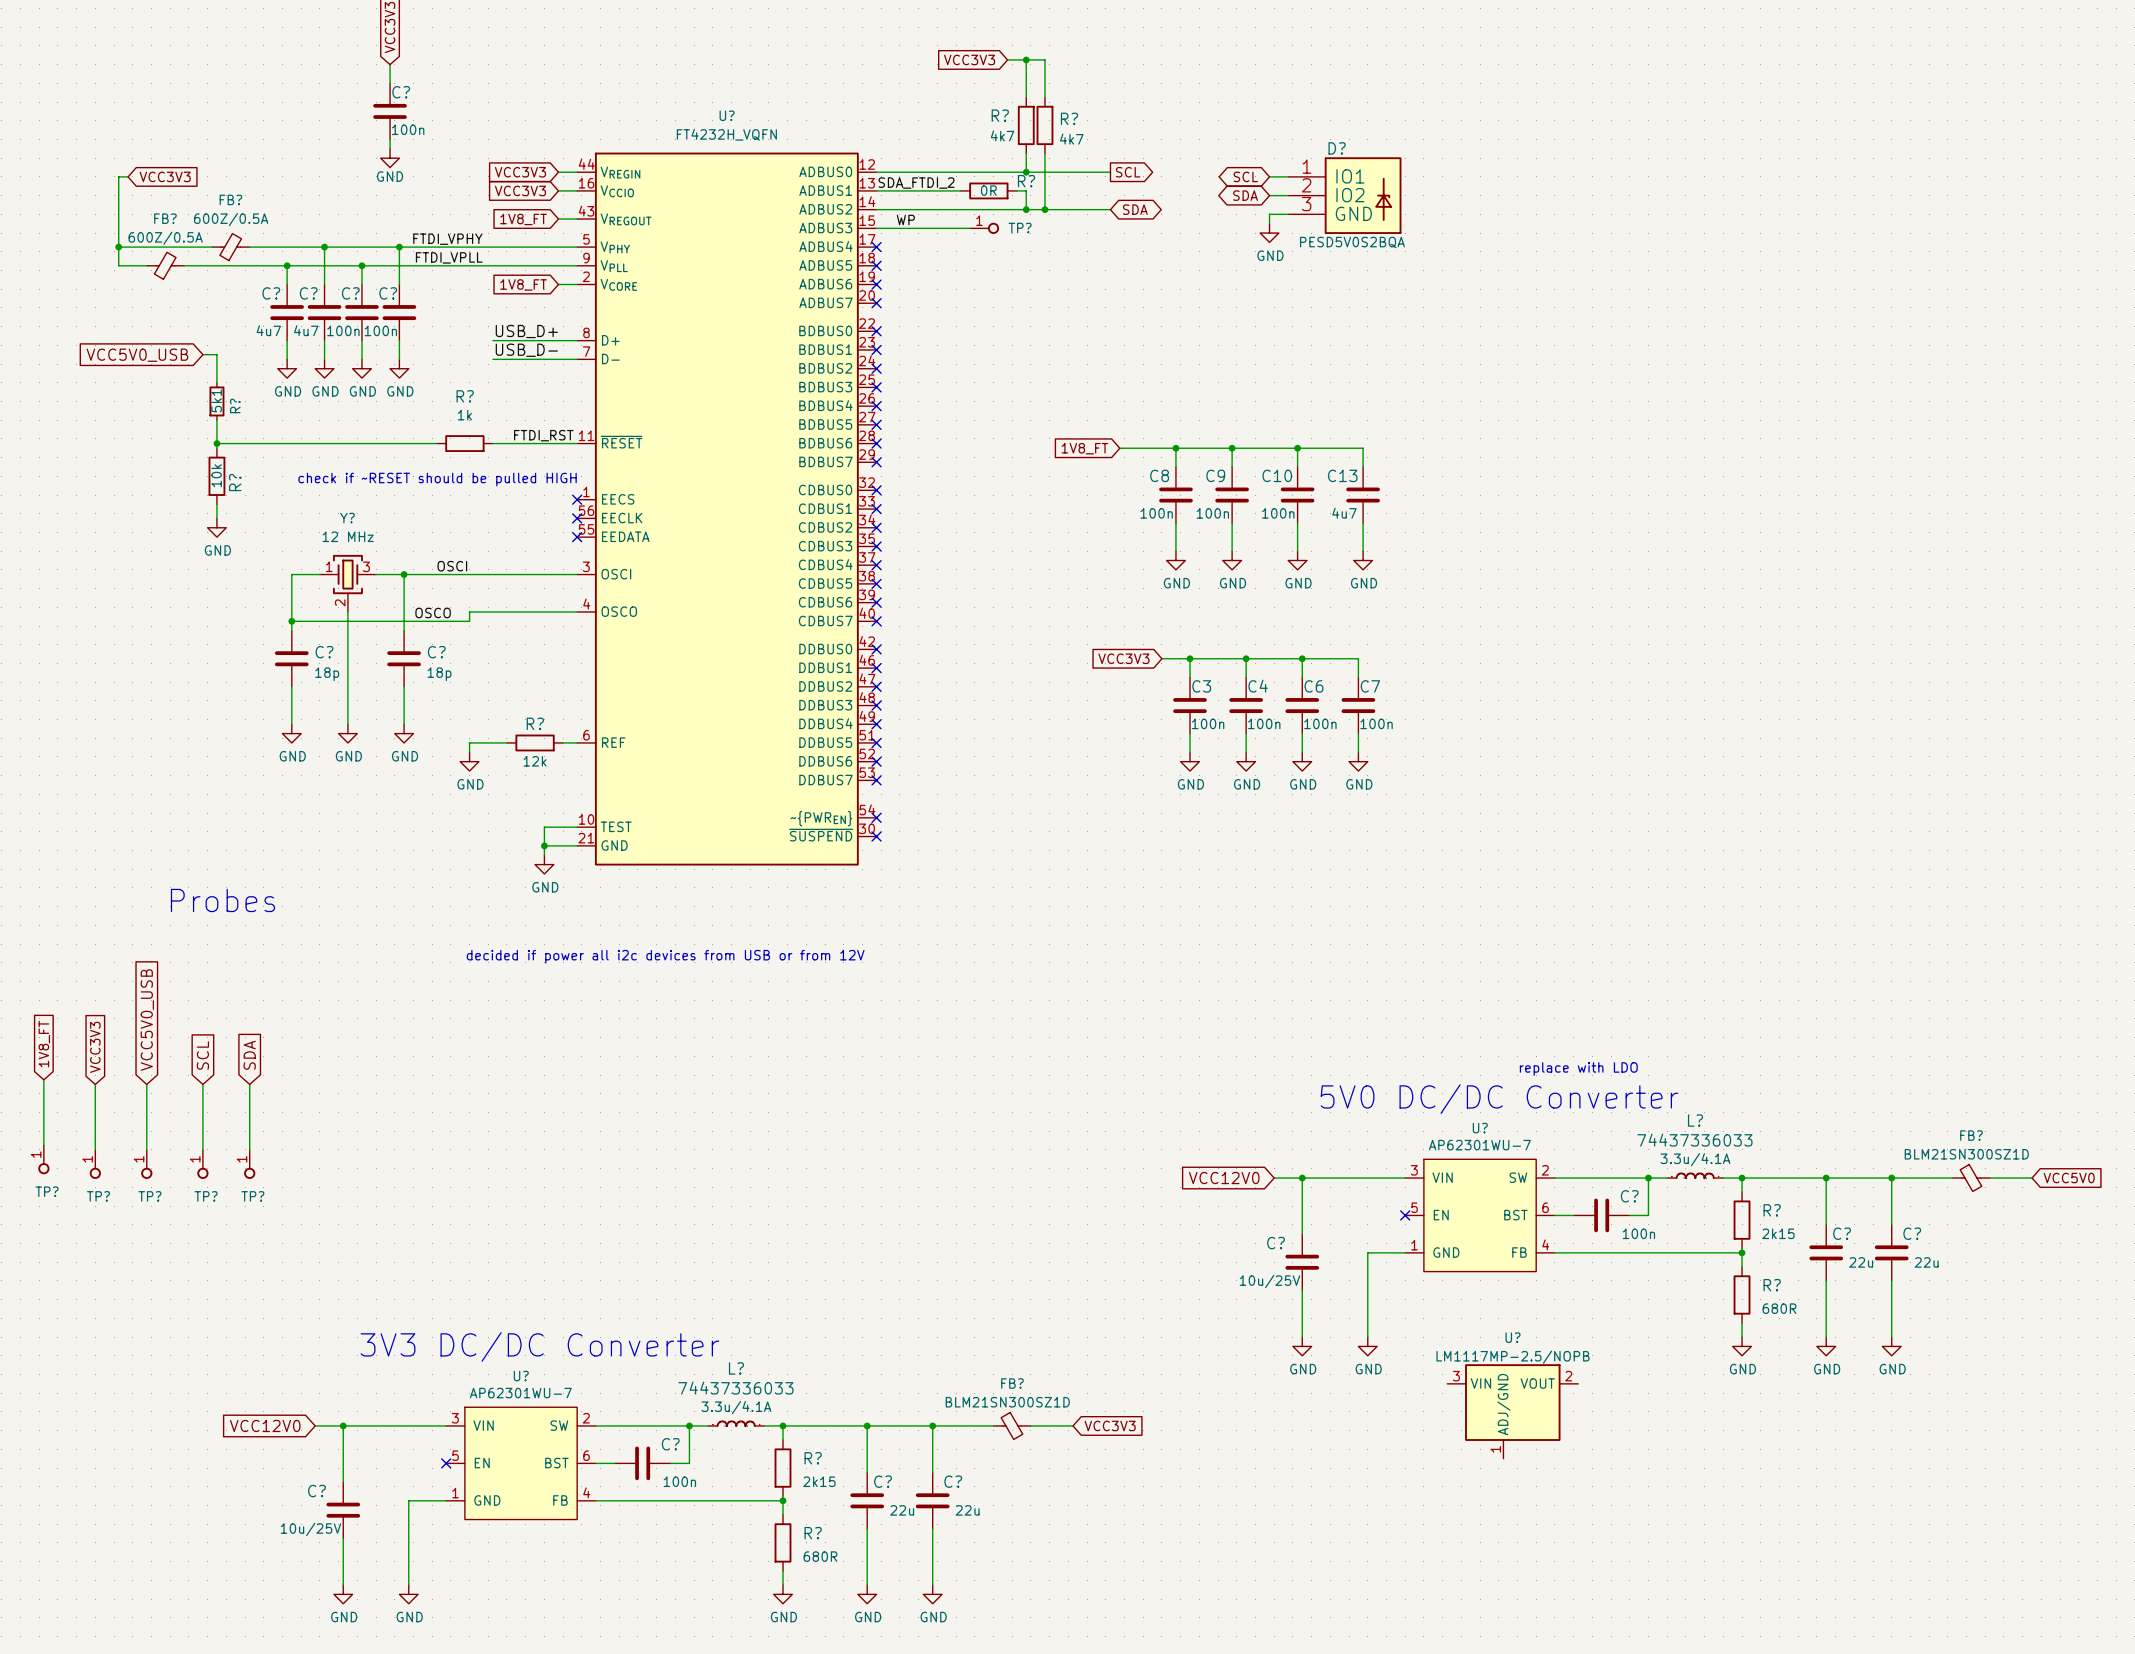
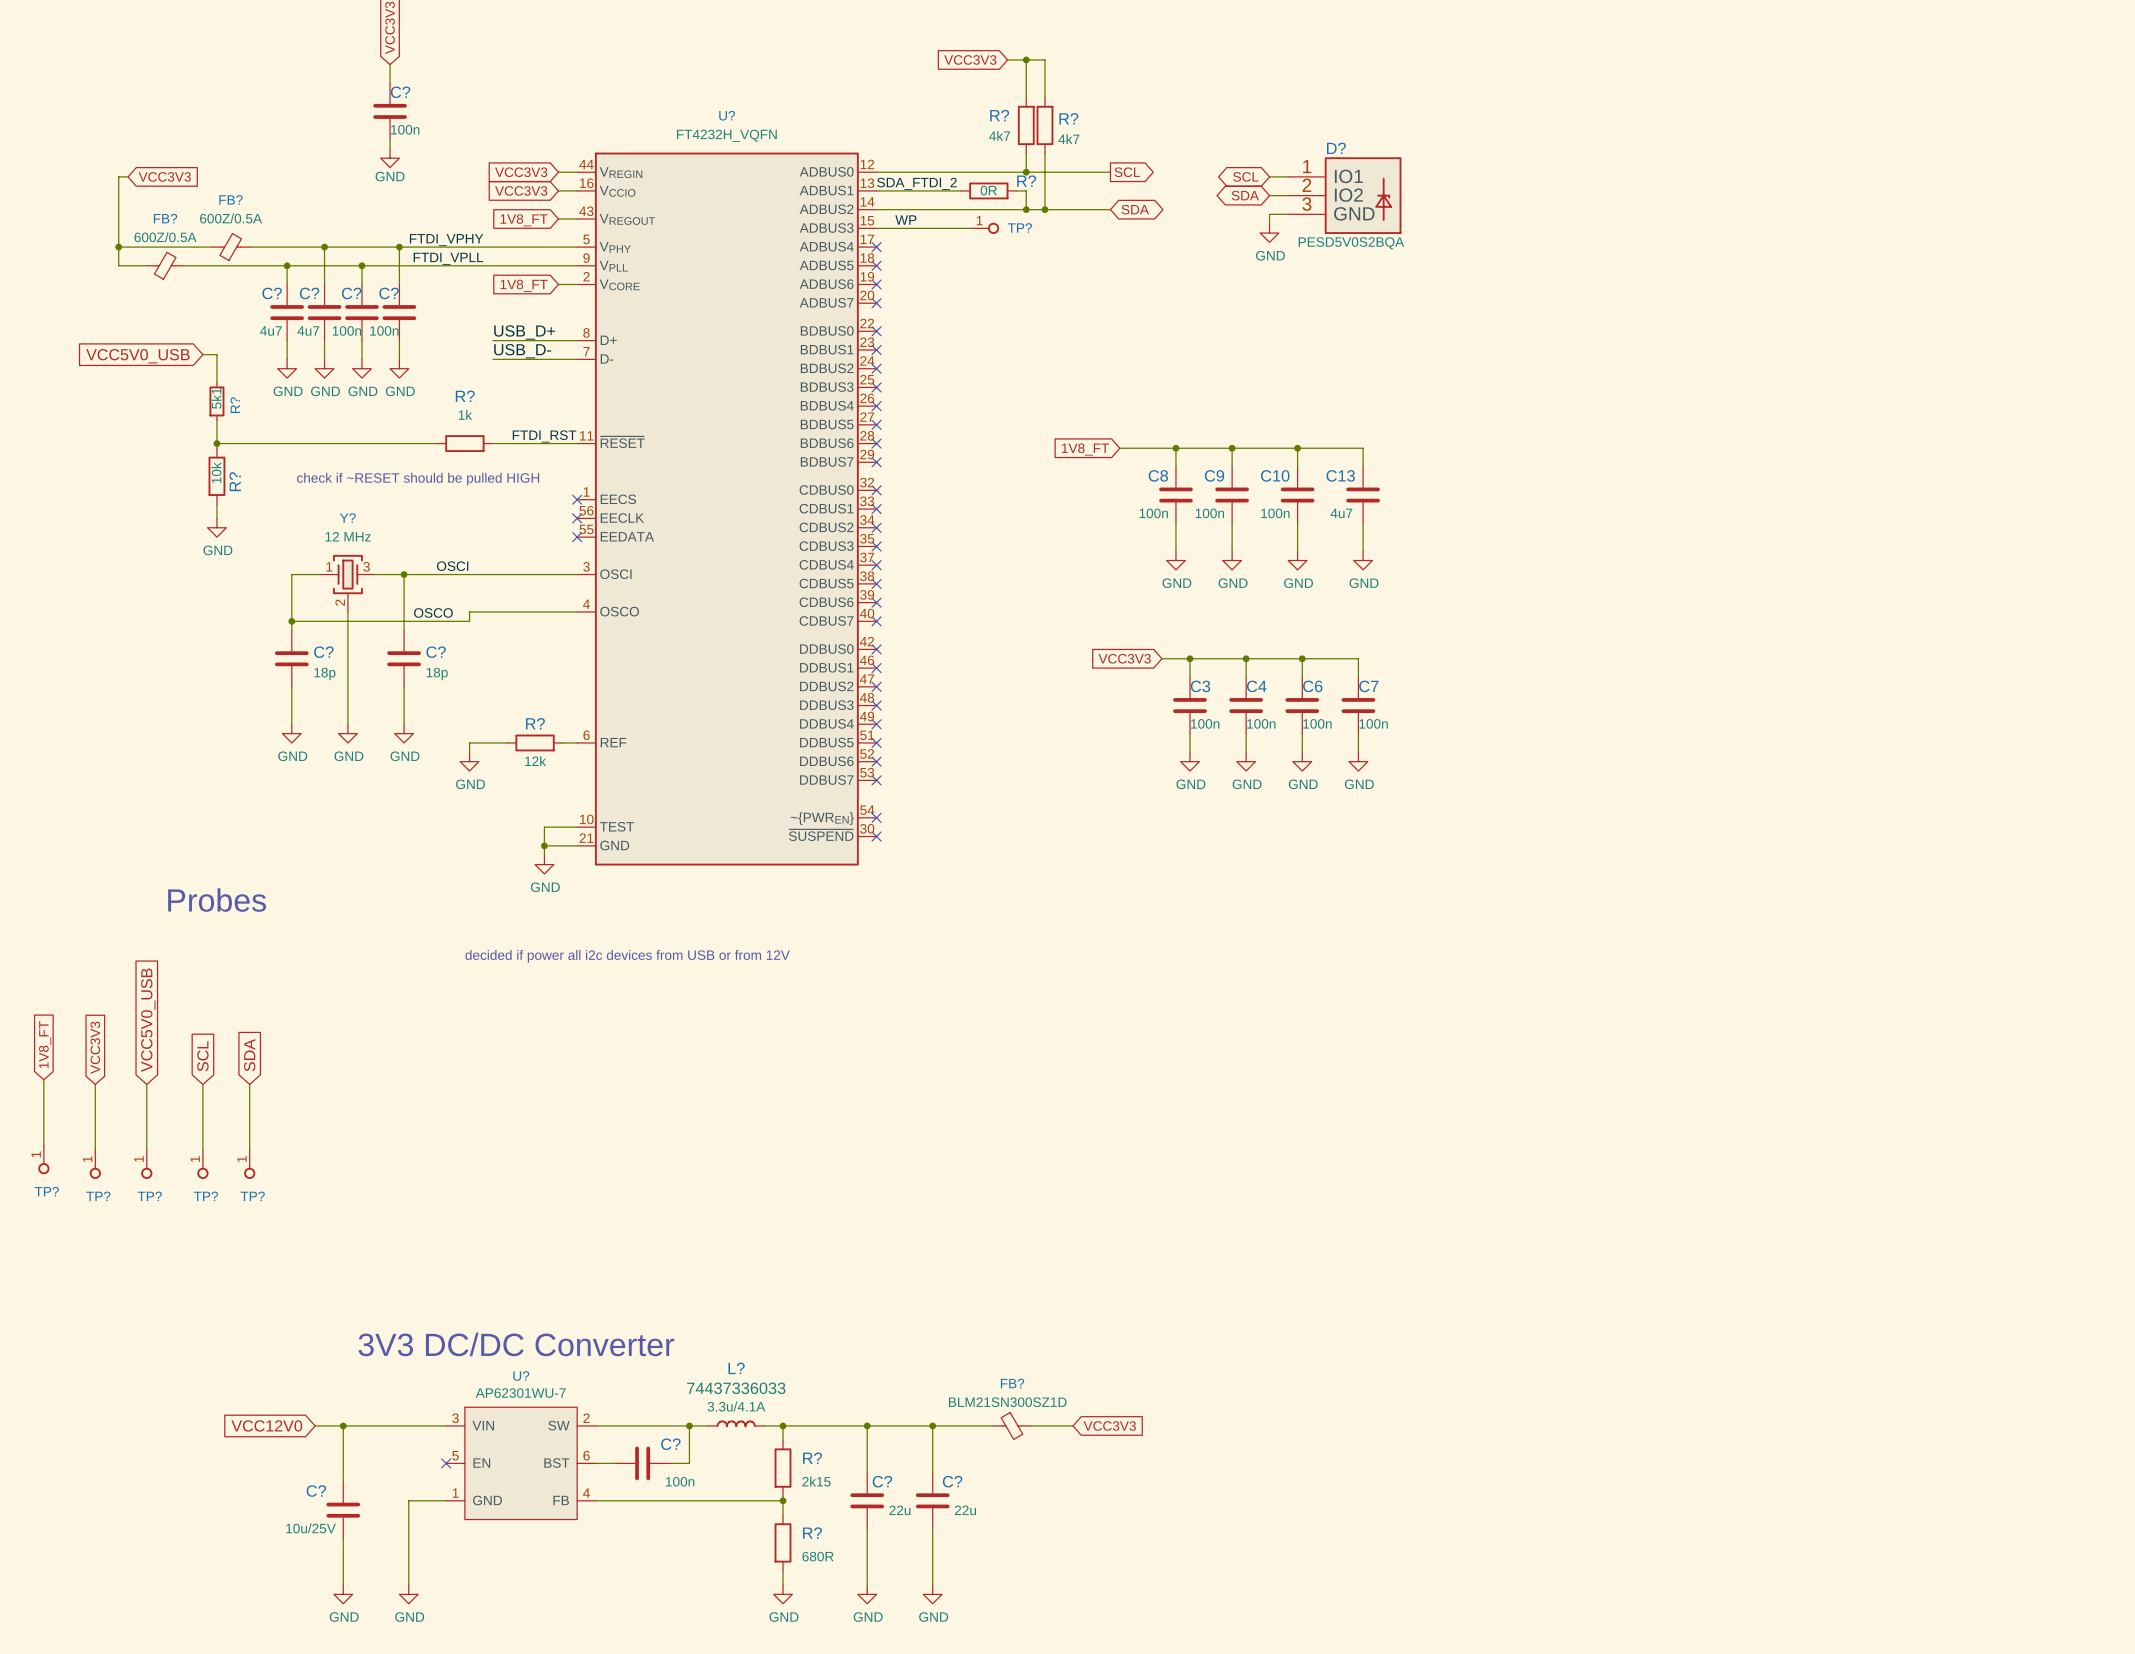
text: replace with LDO (1578, 1069) -> none
text: 5V0 DC/DC Converter (1499, 1099) -> none
L?: 74437336033 (1695, 1175) -> none
global label: VCC12V0 (1224, 1178) -> none
wire: (1274, 1178) (1405, 1178) -> none
wire: (1302, 1178) (1302, 1234) -> none
junction: (1302, 1178) -> none
wire: (1554, 1178) (1667, 1178) -> none
wire: (1648, 1178) (1648, 1215) (1629, 1215) -> none
junction: (1648, 1178) -> none
wire: (1723, 1178) (1952, 1178) -> none
wire: (1742, 1178) (1742, 1192) -> none
junction: (1742, 1178) -> none
wire: (1826, 1178) (1826, 1224) -> none
junction: (1826, 1178) -> none
wire: (1891, 1178) (1891, 1224) -> none
junction: (1891, 1178) -> none
FB?: BLM21SN300SZ1D (1971, 1178) -> none
wire: (1989, 1178) (2032, 1178) -> none
global label: VCC5V0 (2069, 1178) -> none
no-connect mark: (1405, 1215) -> none
U?: AP62301WU-7 (1480, 1215) -> none
wire: (1554, 1215) (1573, 1215) -> none
C?: (1601, 1215) -> none
R?: (1742, 1220) -> none
wire: (1742, 1248) (1742, 1266) -> none
wire: (1405, 1252) (1367, 1252) (1367, 1337) -> none
wire: (1554, 1252) (1742, 1252) -> none
junction: (1742, 1252) -> none
C?: (1826, 1252) -> none
C?: (1891, 1252) -> none
C?: (1302, 1262) -> none
wire: (1826, 1280) (1826, 1337) -> none
wire: (1891, 1280) (1891, 1337) -> none
wire: (1302, 1290) (1302, 1337) -> none
R?: (1742, 1294) -> none
wire: (1742, 1323) (1742, 1337) -> none
power symbol: GND (1302, 1346) -> none
power symbol: GND (1367, 1346) -> none
power symbol: GND (1742, 1346) -> none
power symbol: GND (1826, 1346) -> none
power symbol: GND (1891, 1346) -> none
U?: (1512, 1411) -> none

